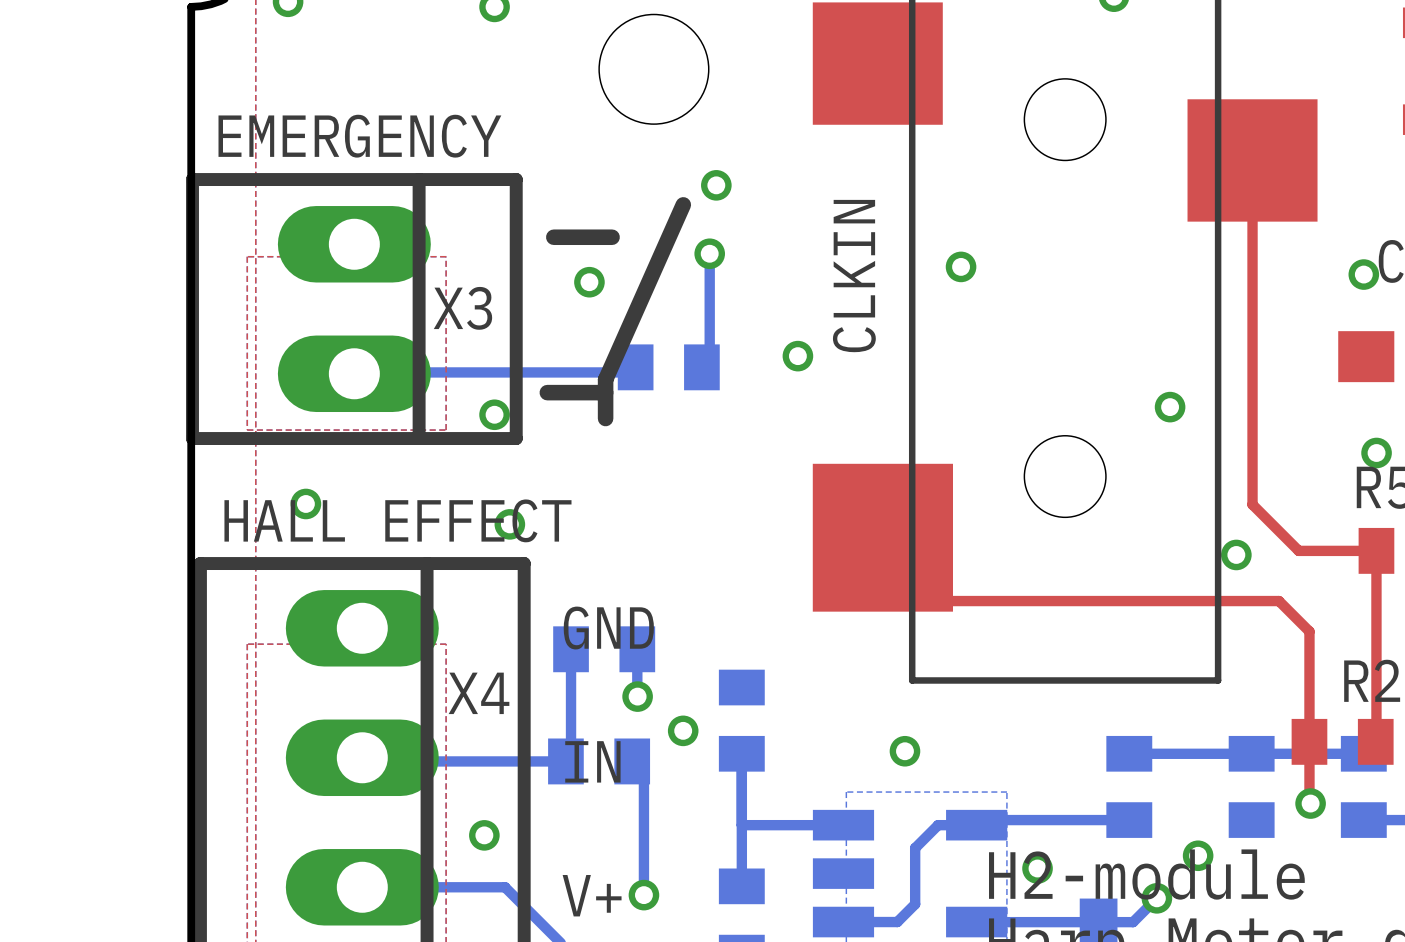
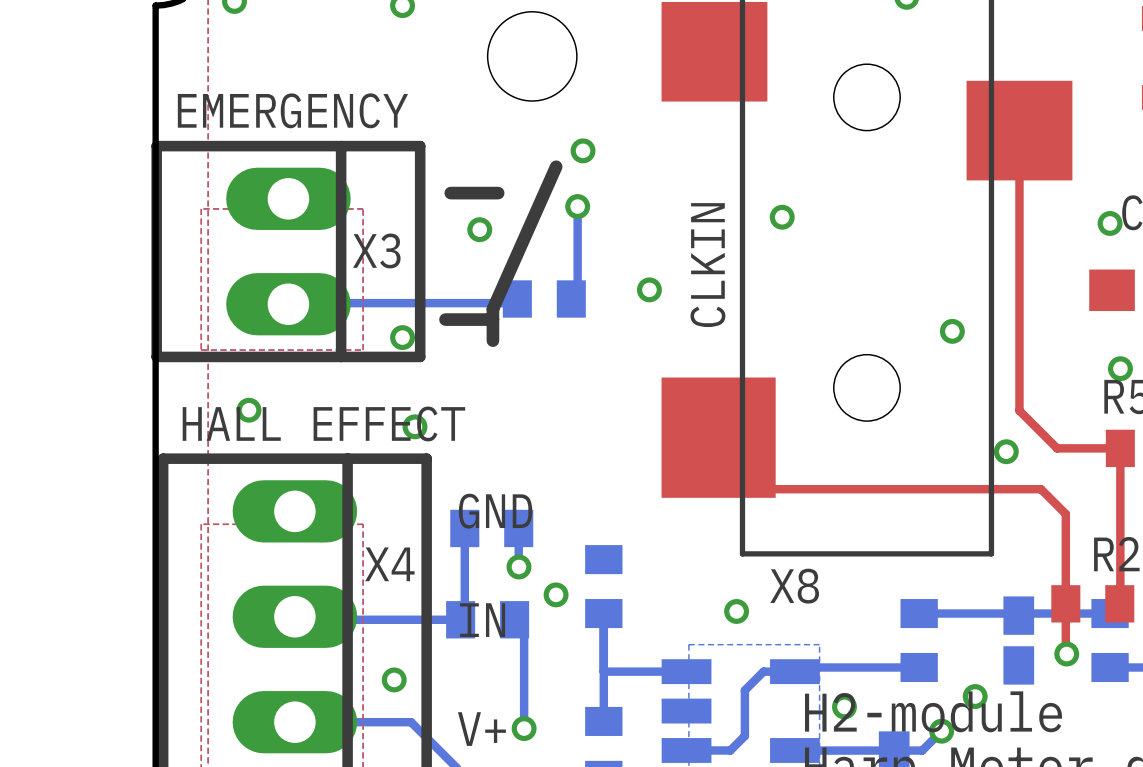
CLKIN name: CLKIN (854, 276) -> X8 (794, 586)
text: none -> CLKIN (707, 265)
part footprint: [1228, 735, 1275, 838] -> [1003, 596, 1035, 685]

